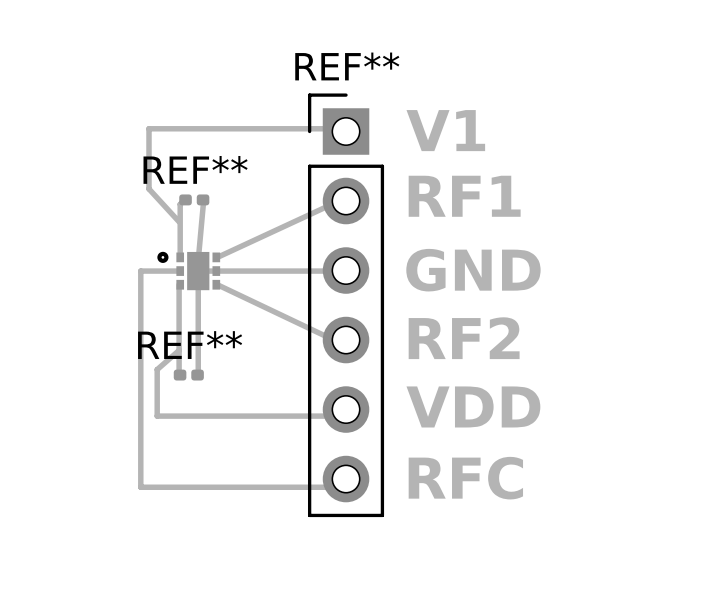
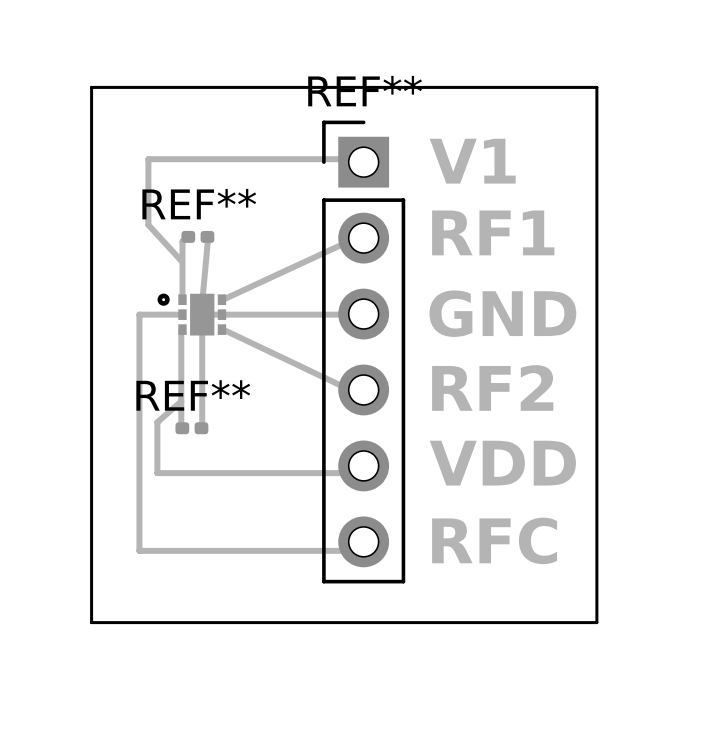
board edge: none -> (91, 87) (596, 87) (596, 622) (91, 622) (91, 87)

